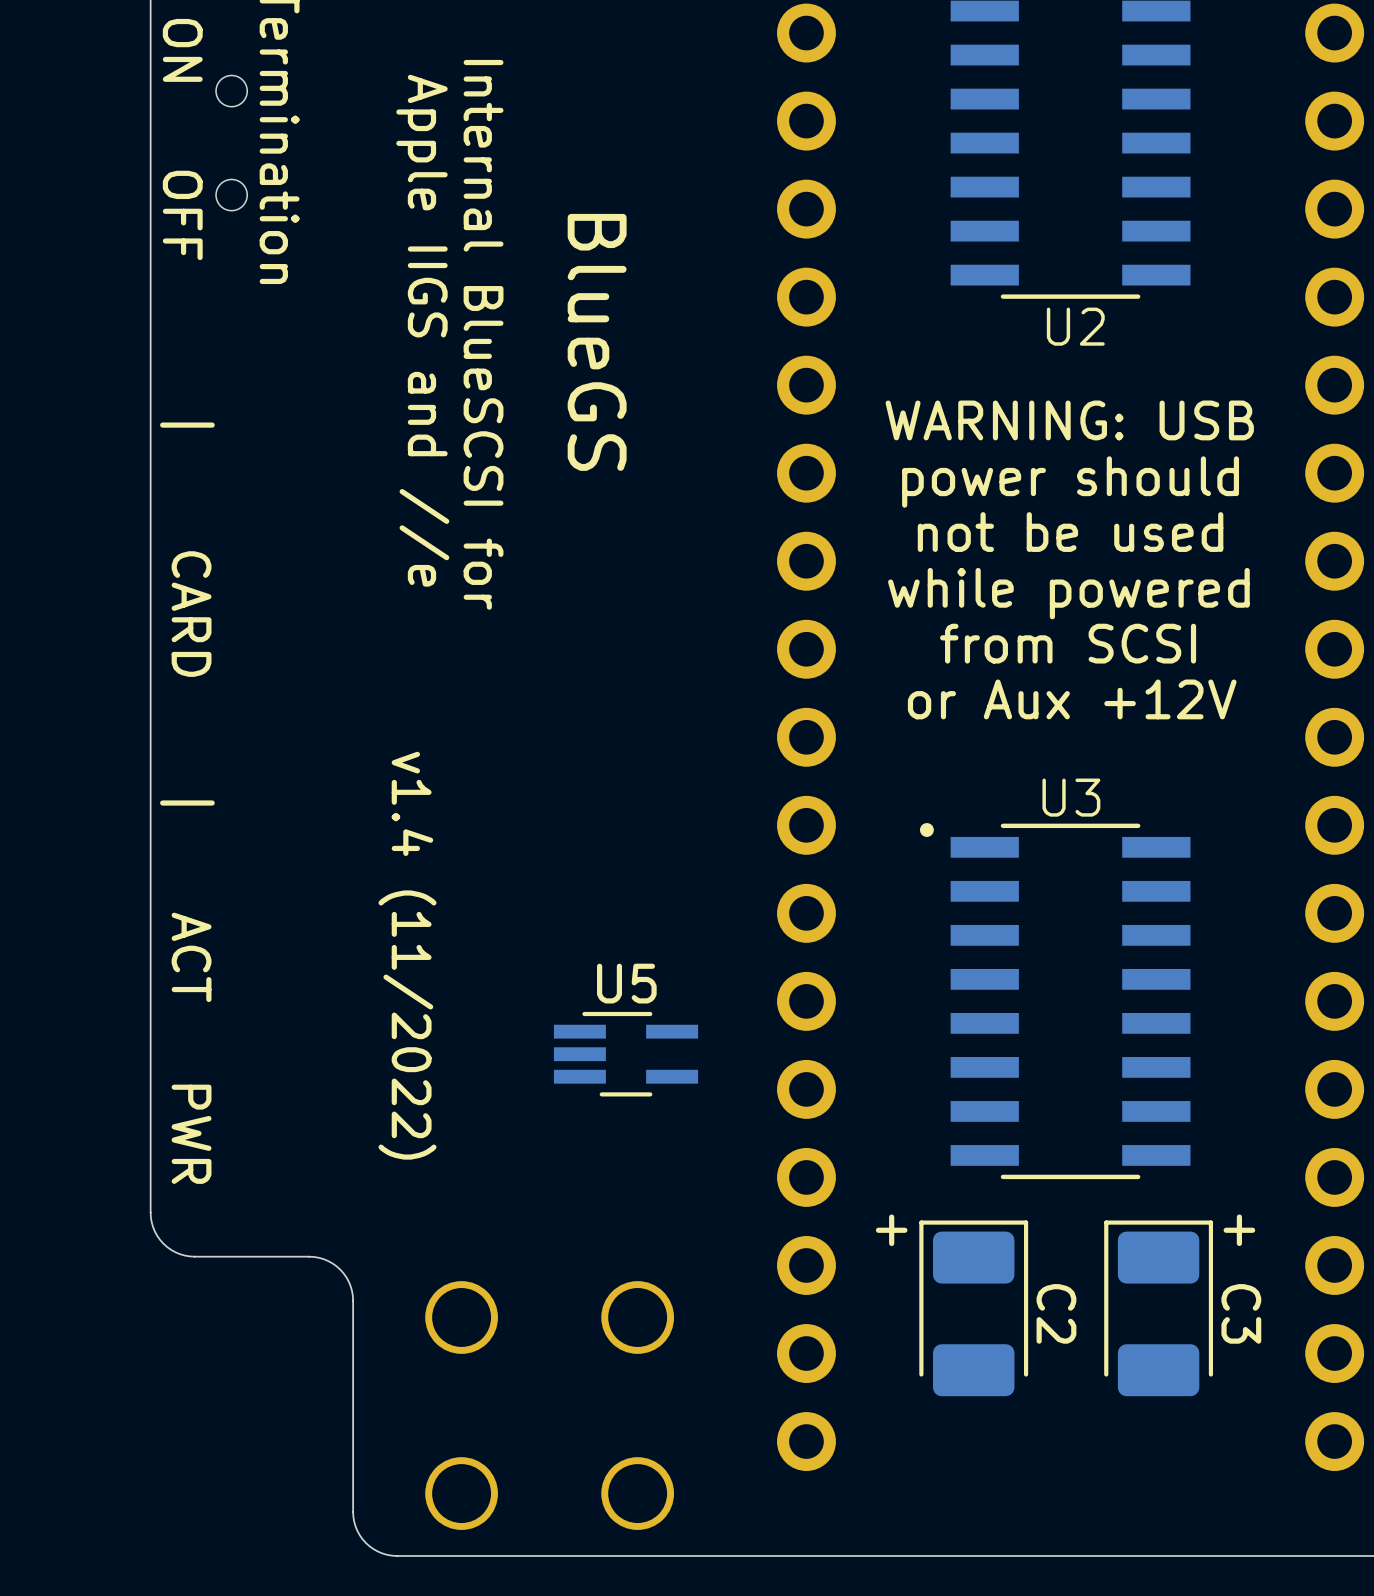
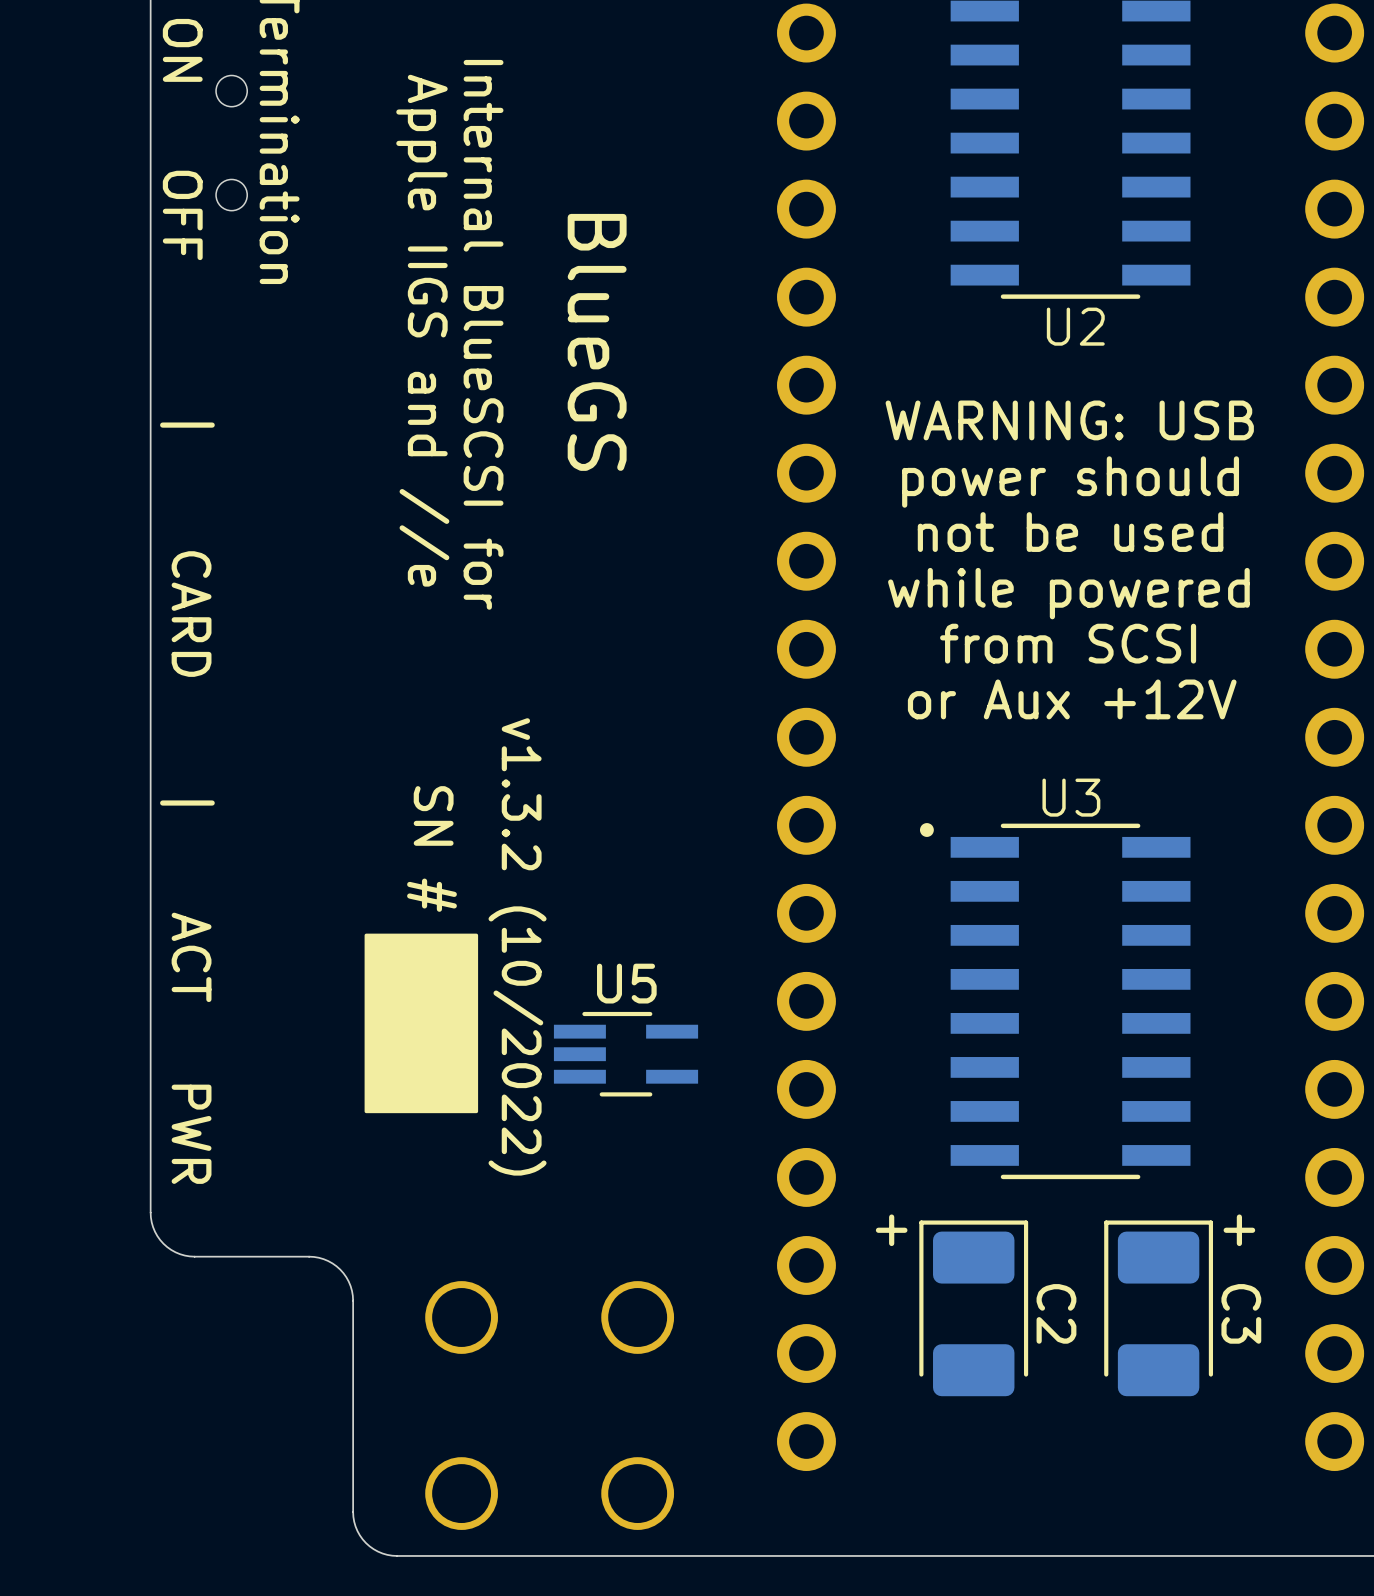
text: none -> SN # (431, 848)
drawing: none -> [364, 933, 479, 1114]
text: none -> v1.3.2 (10/2022) (517, 946)
text: v1.4 (11/2022) (407, 955) -> none

